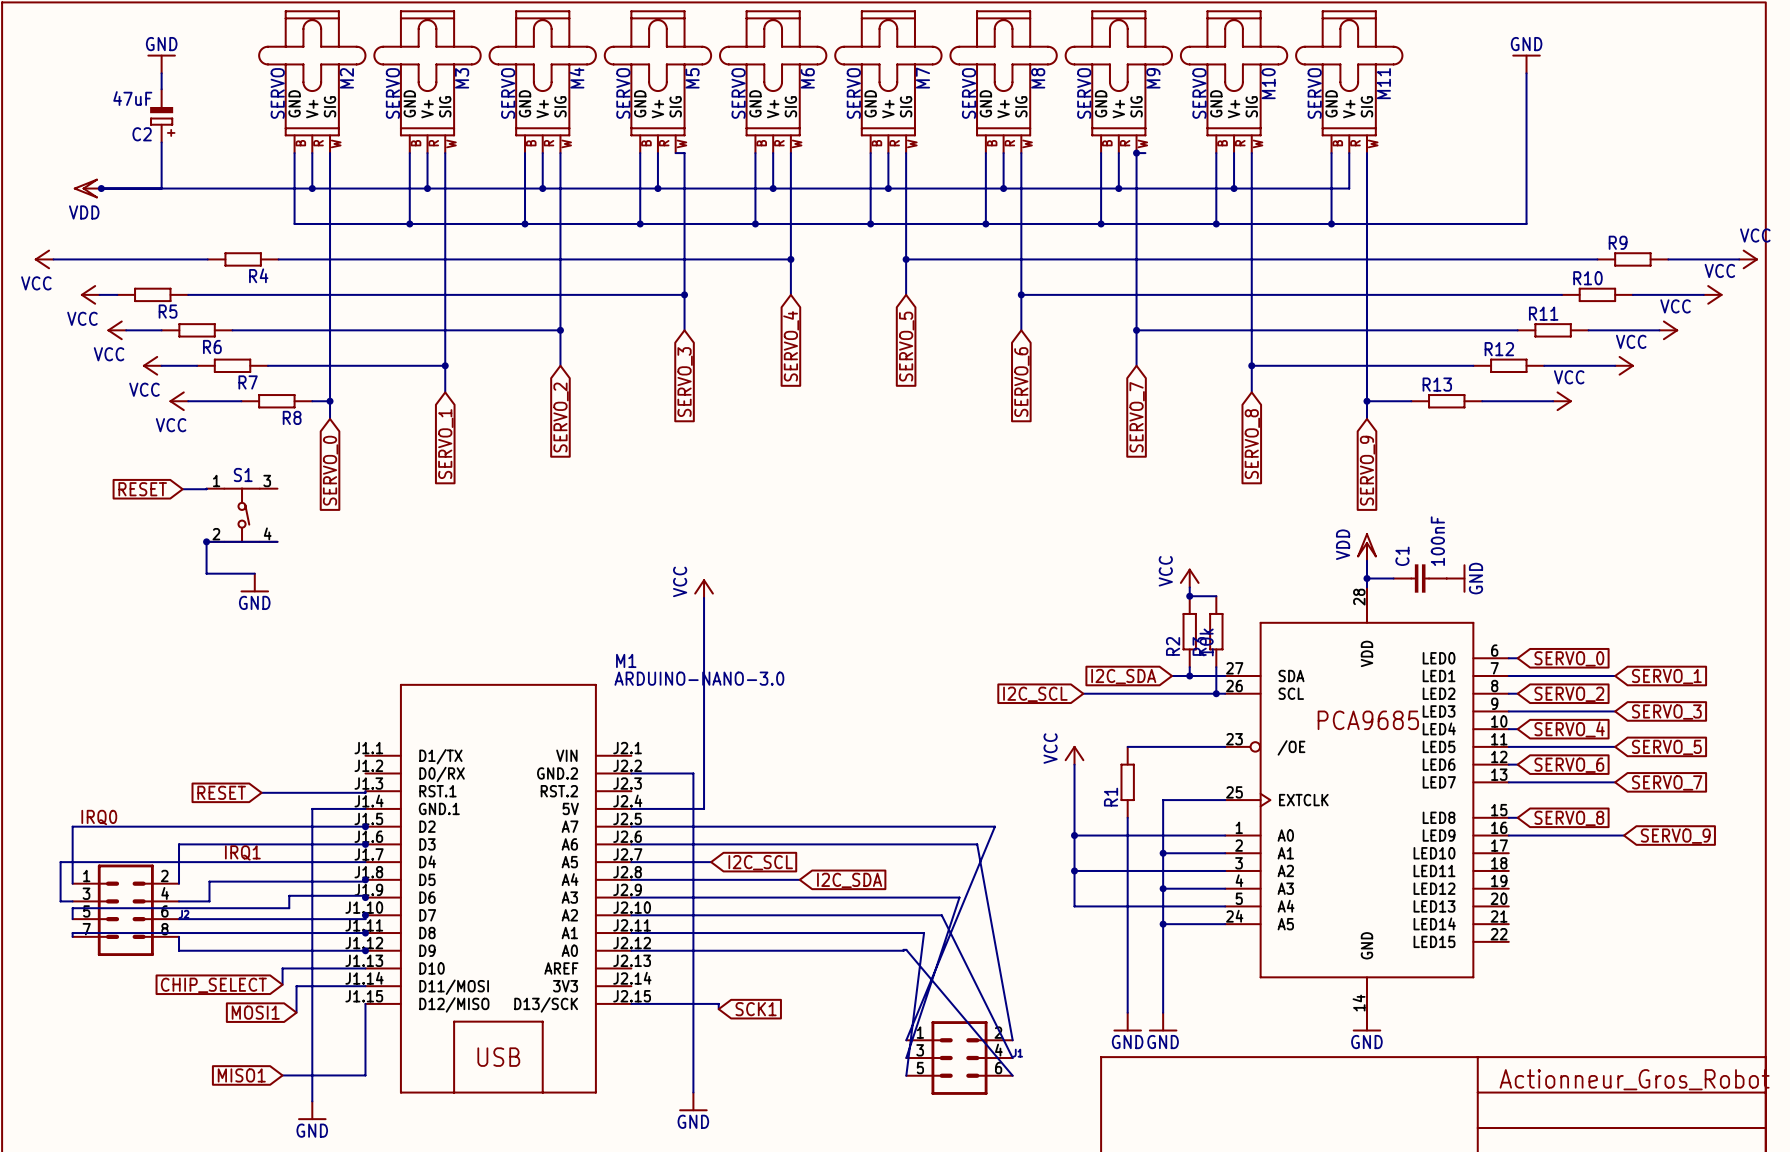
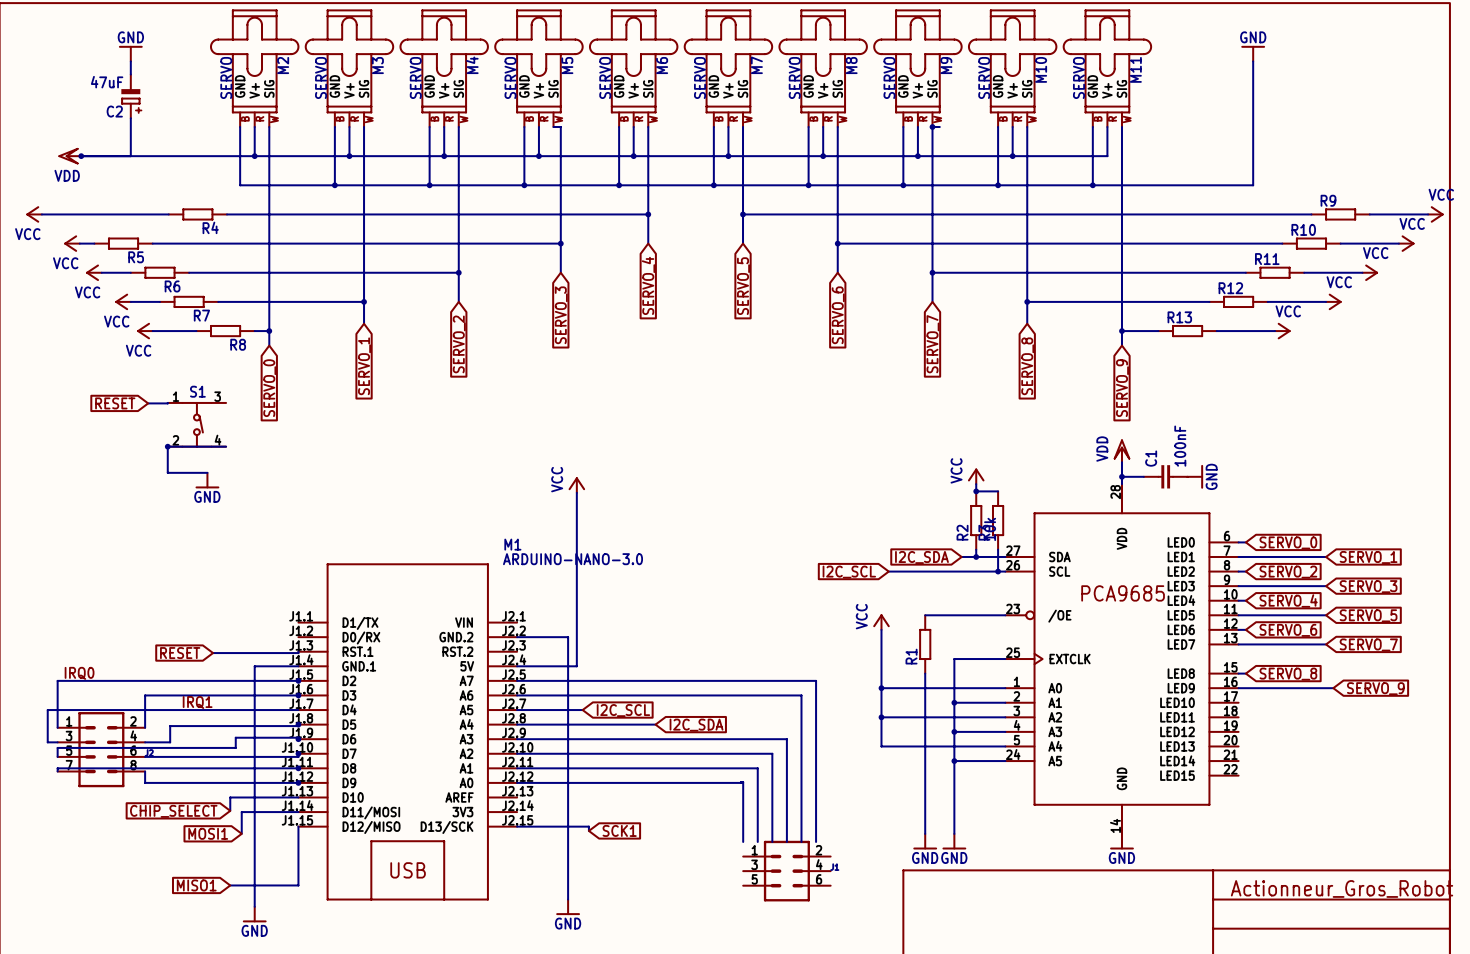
wire: (994, 826) (906, 1040) -> (816, 680) (816, 841)
wire: (977, 844) (1012, 1040) -> (801, 695) (801, 841)
wire: (959, 897) (906, 1058) -> (786, 739) (786, 841)
wire: (941, 915) (1012, 1058) -> (772, 753) (772, 841)
wire: (924, 933) (906, 1075) -> (757, 768) (757, 841)
wire: (906, 949) (1012, 1075) -> (743, 782) (743, 841)

